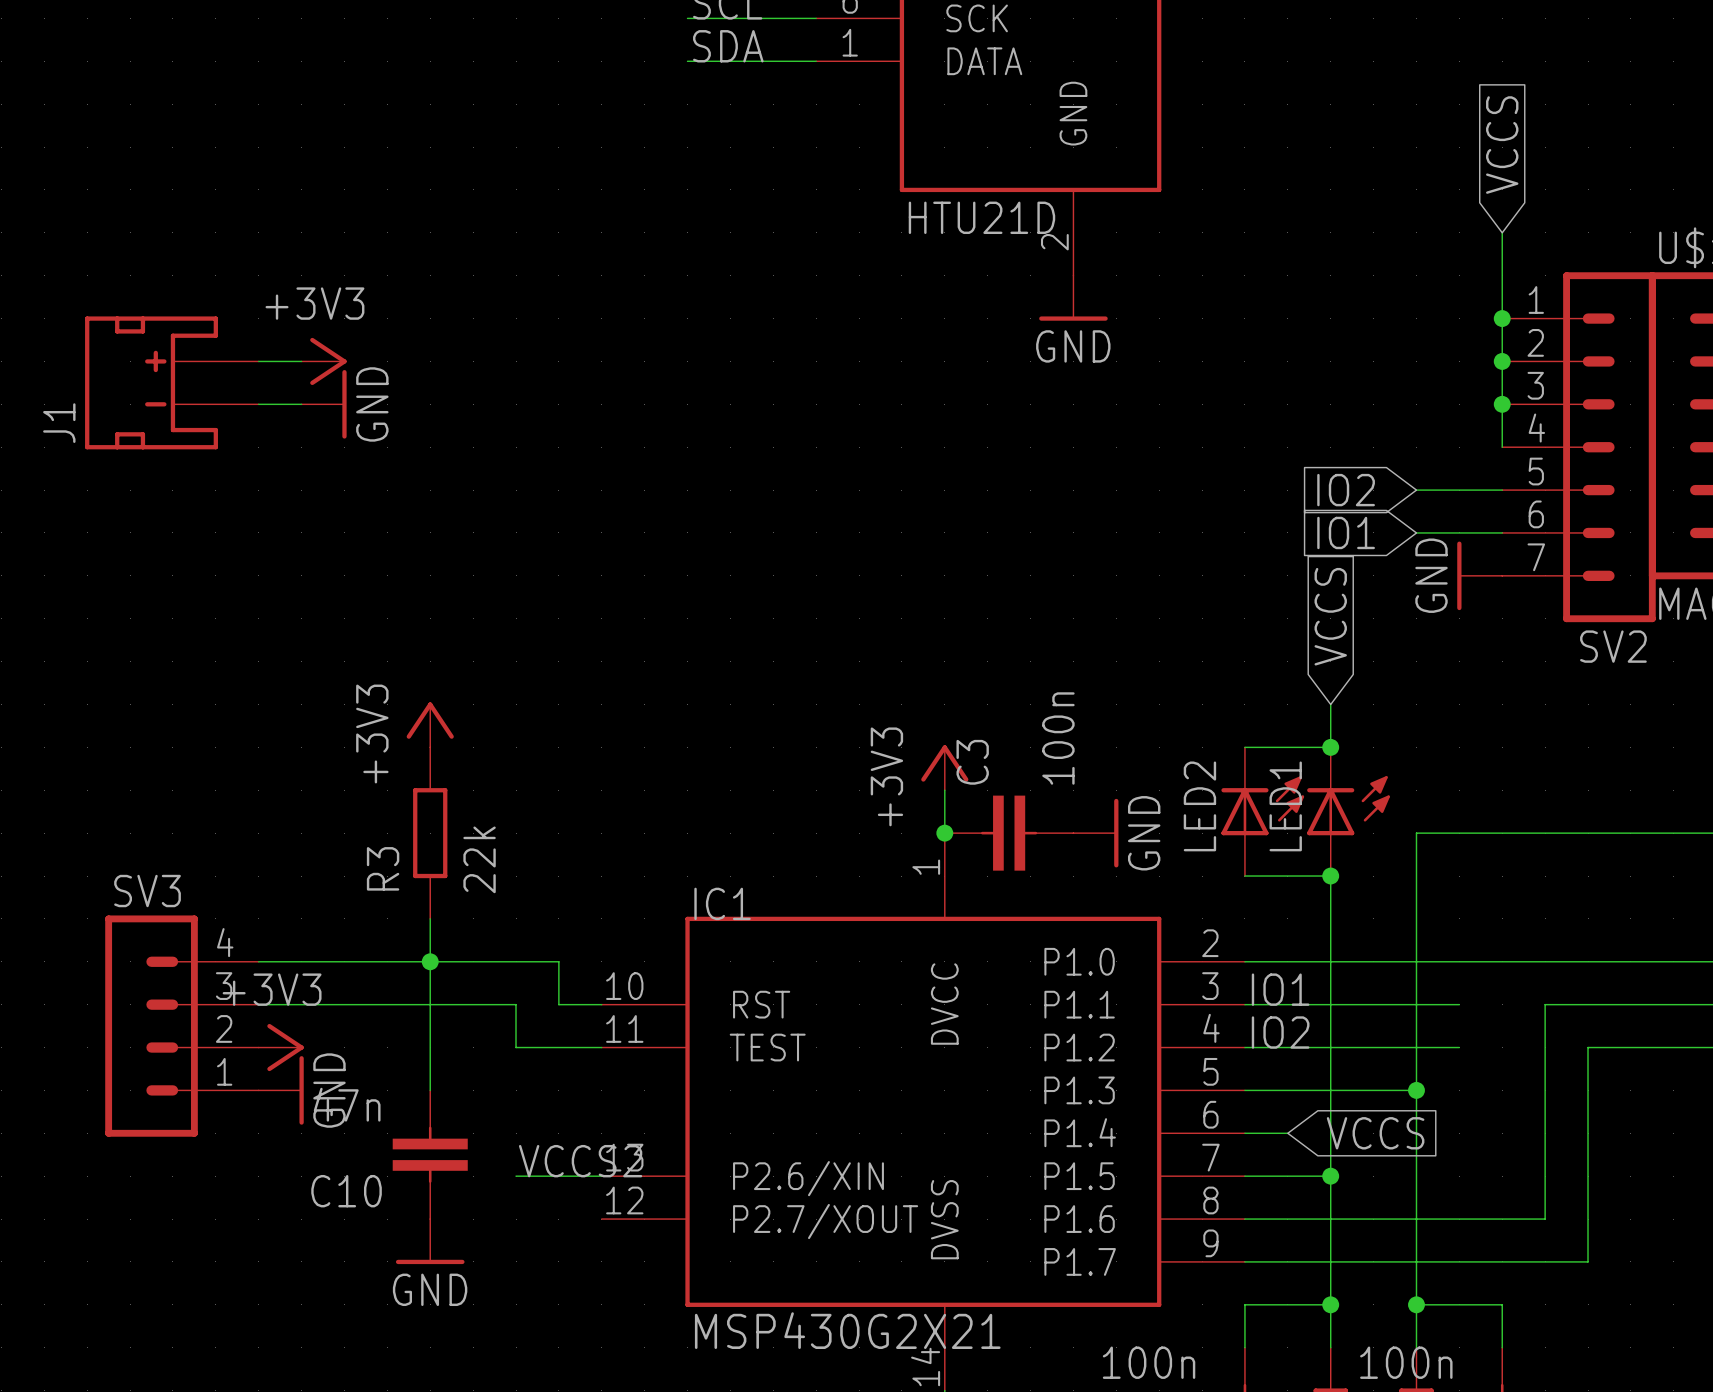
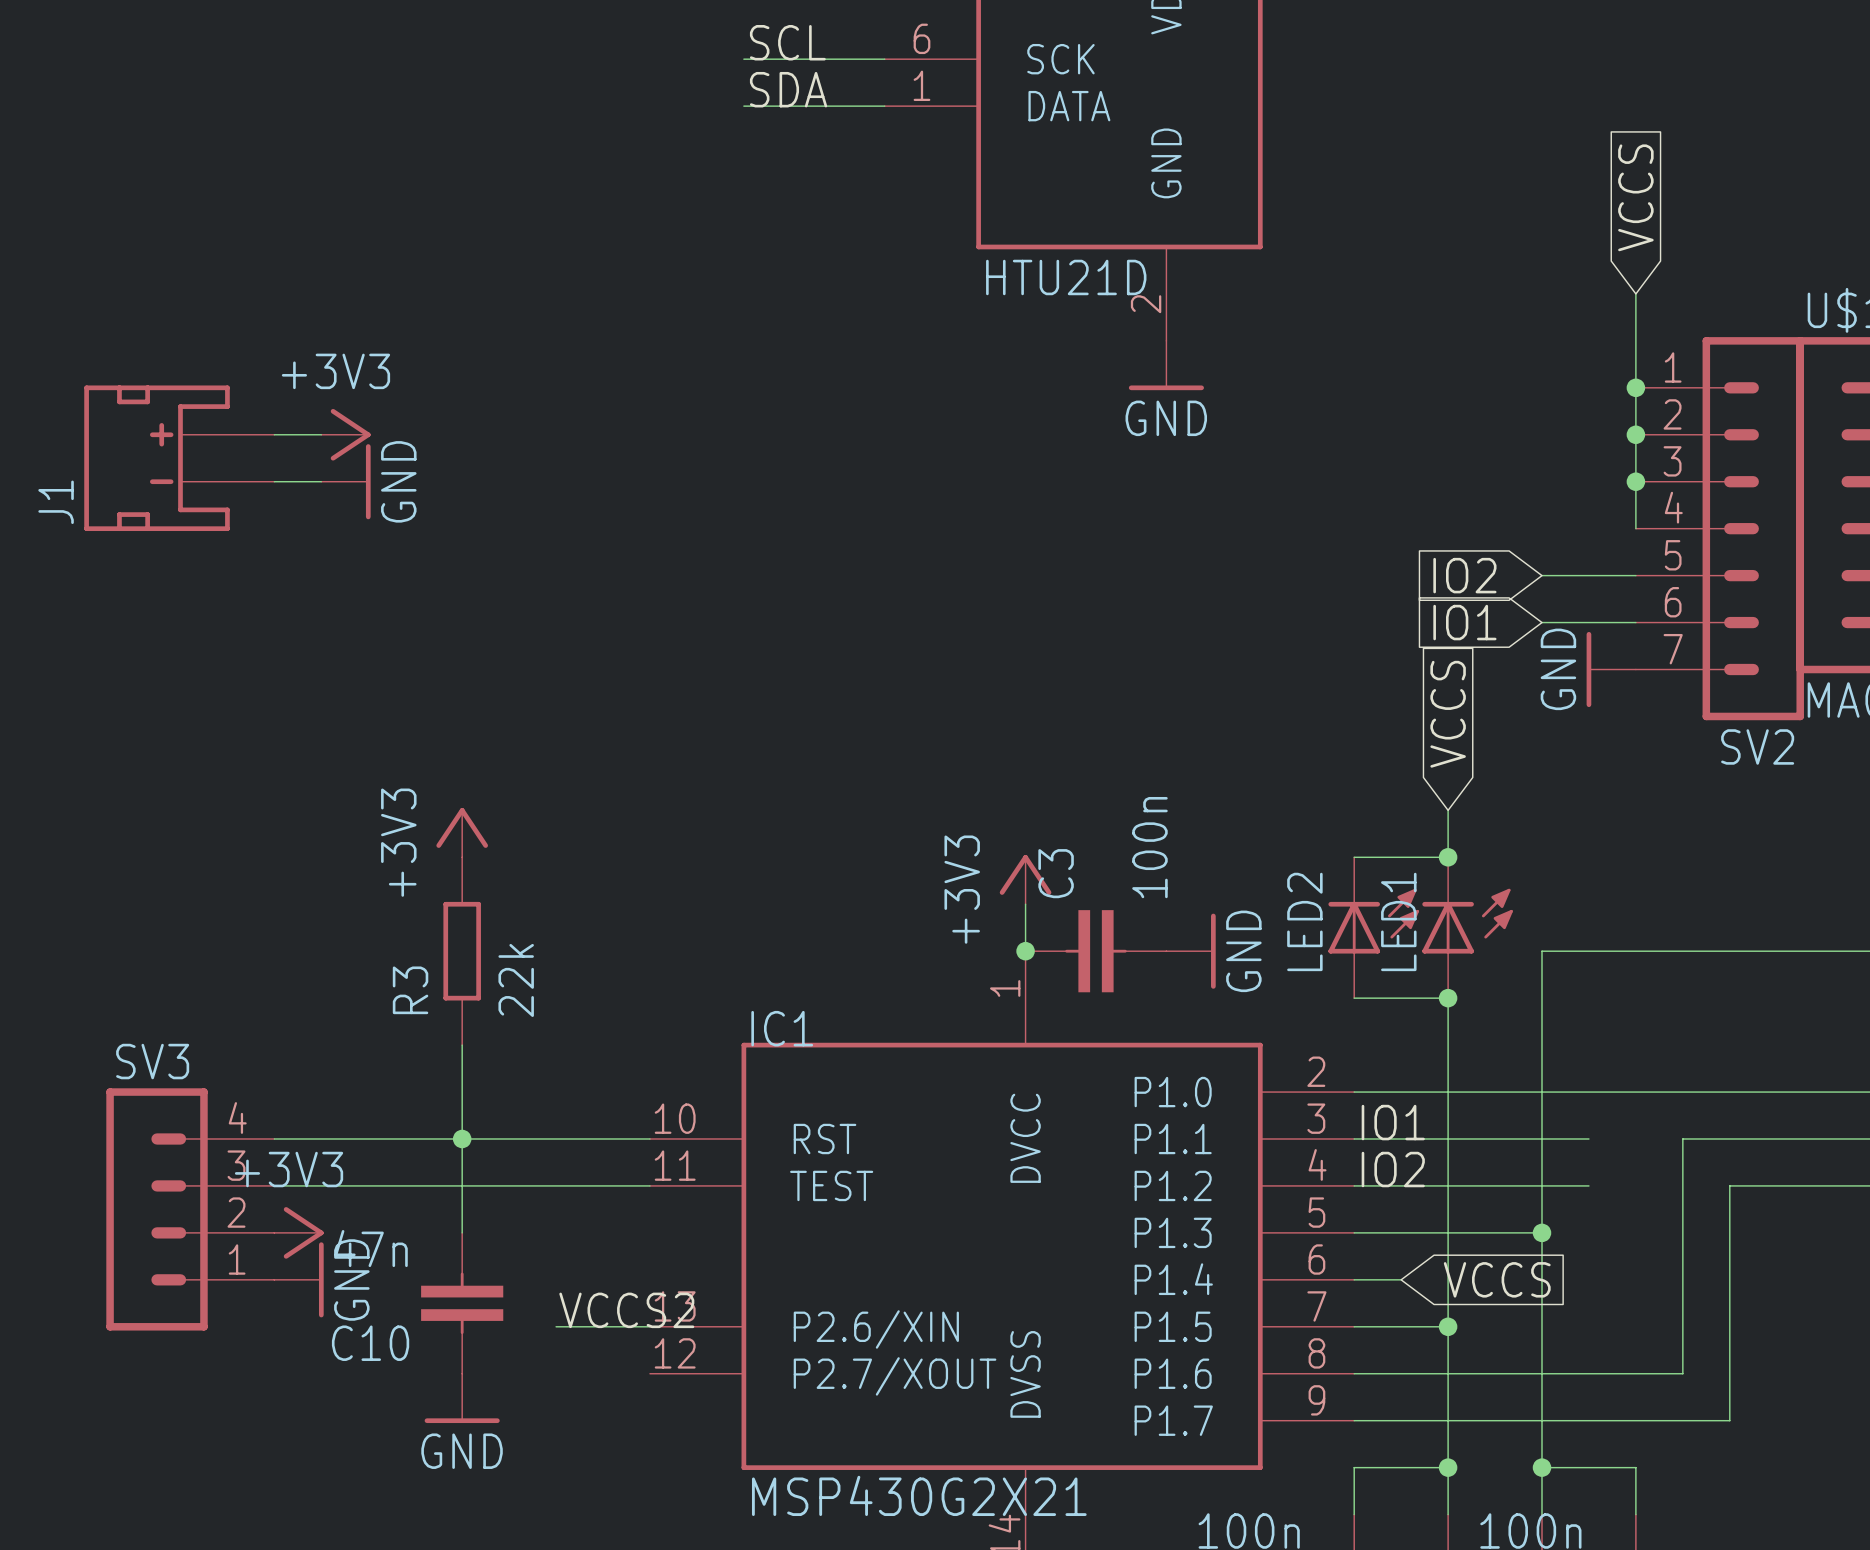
wire: (258, 961) (558, 961) (558, 1004) -> none
junction position: (430, 961) -> (462, 1138)
wire: (516, 1004) (516, 1047) -> (556, 1138) (603, 1138)
SV3 position: (181, 1026) -> (190, 1209)
wire: none -> (274, 1185) (556, 1185)
power symbol: +3V3 (281, 1047) -> none
power symbol: GND (281, 1090) -> +3V3 (299, 1232)
power symbol: none -> GND (299, 1279)

